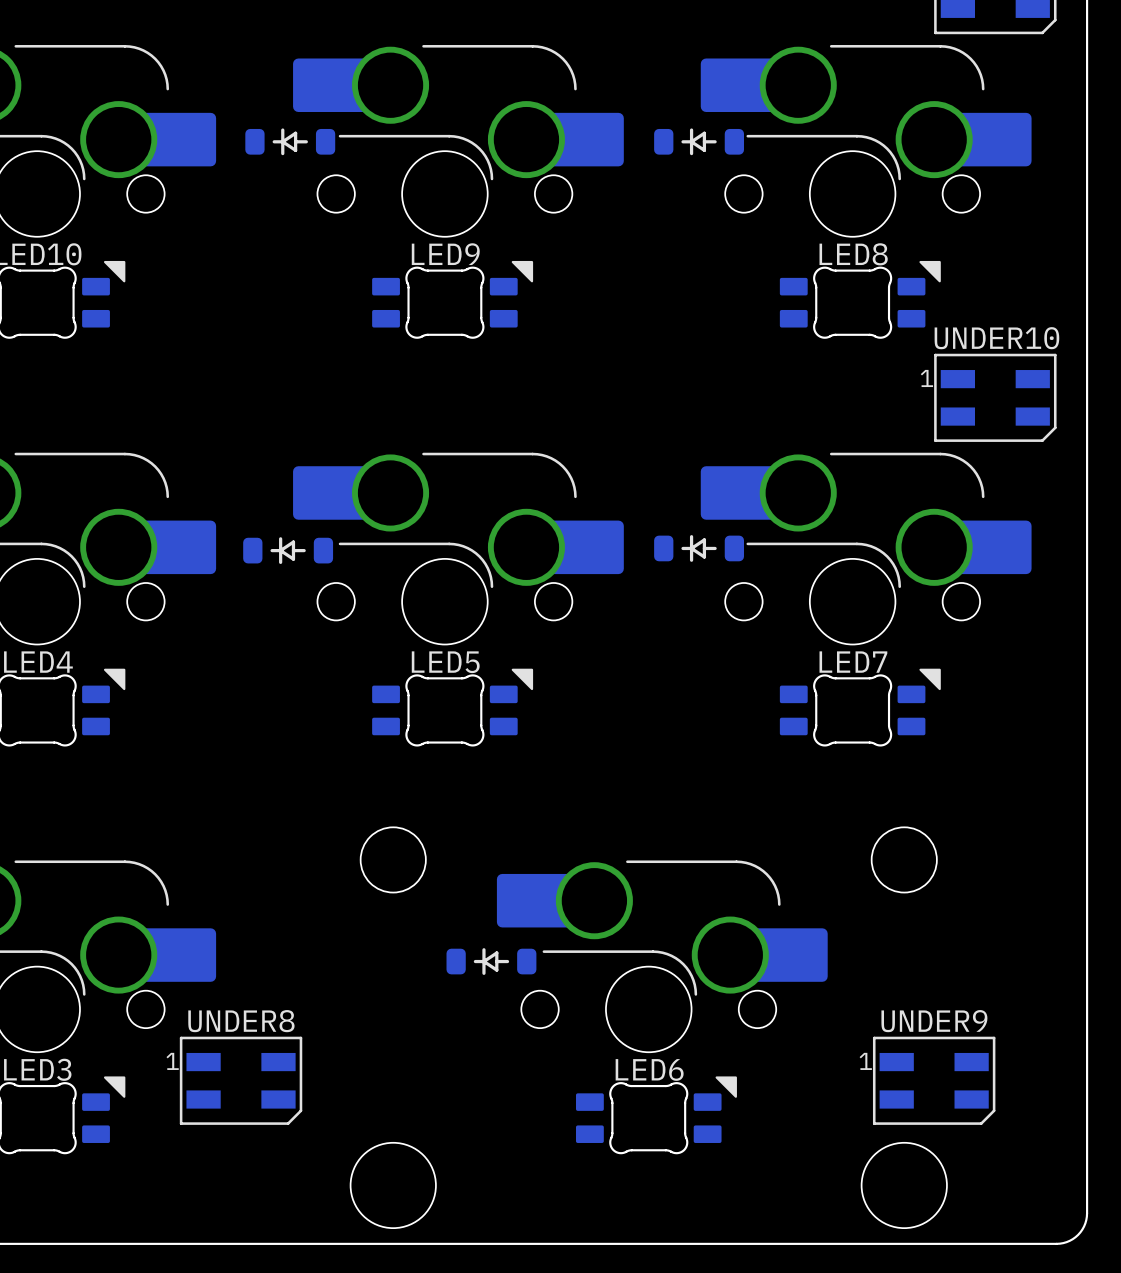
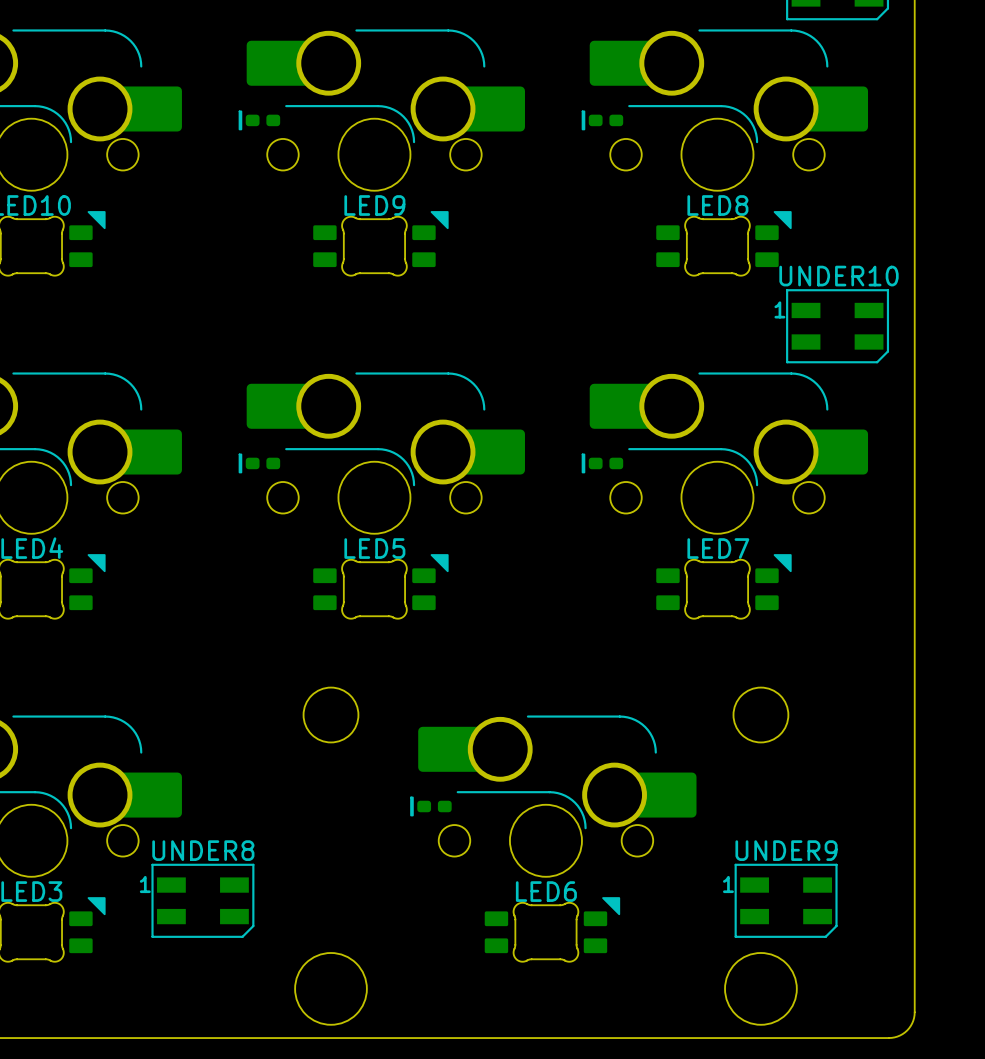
part footprint: [245, 128, 336, 156] -> [238, 110, 281, 131]
part footprint: [654, 128, 745, 156] -> [581, 110, 624, 131]
part footprint: [654, 535, 745, 562] -> [581, 453, 624, 474]
part: (288, 550) -> none
part: none -> (259, 463)
part: (491, 961) -> none
part: none -> (430, 806)

